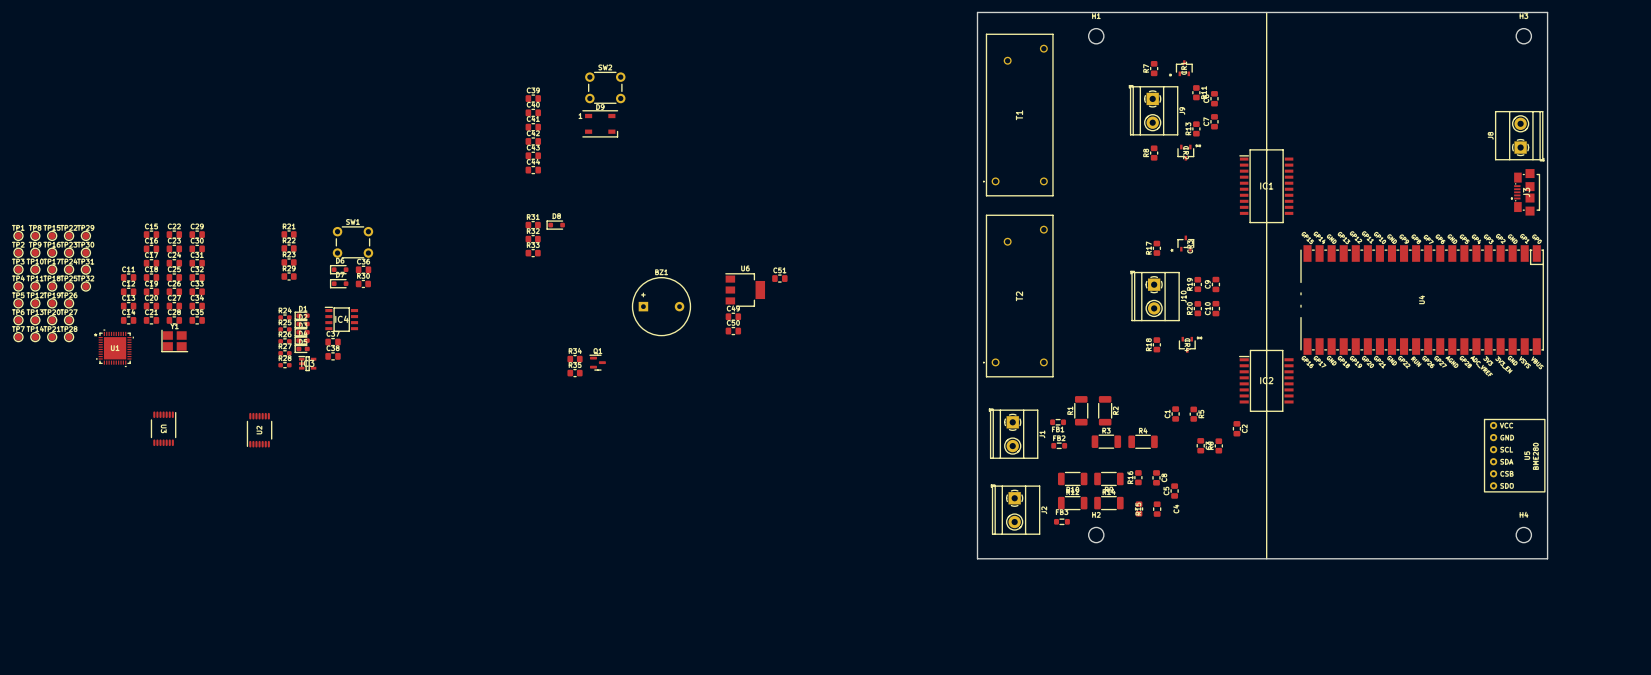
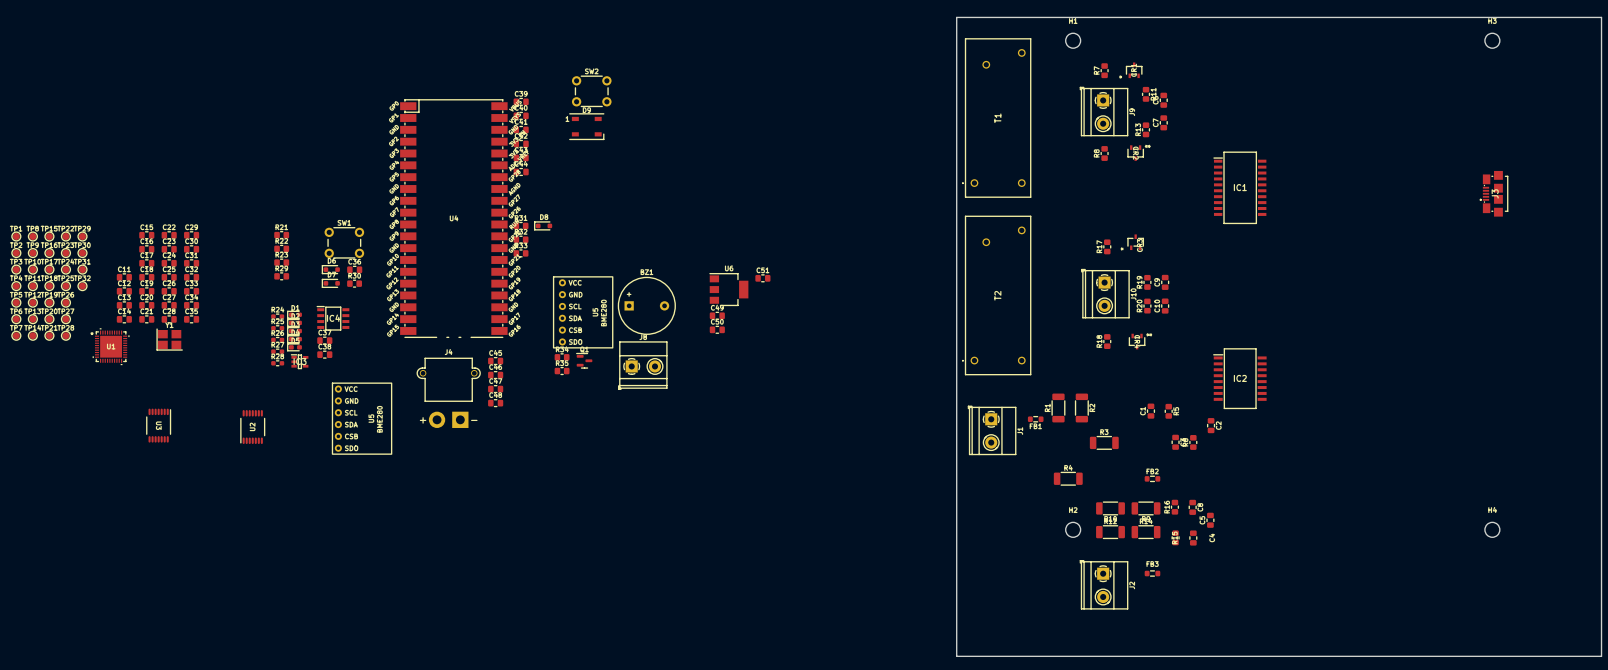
line: (1266, 12) (1266, 558) -> none
board edge: (1547, 12) (1547, 558) (977, 558) -> (1515, 17) (1601, 17) (1601, 656) (956, 656) (956, 553)
part position: (1154, 68) -> (1104, 70)
part position: (1184, 68) -> (1134, 70)
part position: (1196, 92) -> (1146, 94)
part position: (1214, 98) -> (1163, 100)
part position: (1153, 110) -> (1104, 111)
part position: (1214, 121) -> (1163, 122)
part position: (1196, 128) -> (1146, 129)
part rotation: 0° (1519, 136) -> 90° clockwise (642, 365)
part position: (1519, 136) -> (642, 365)
part position: (1185, 152) -> (1135, 153)
part position: (1154, 153) -> (1104, 153)
part position: (1185, 243) -> (1135, 242)
part position: (1156, 248) -> (1107, 246)
part position: (1197, 284) -> (1147, 282)
part position: (1215, 284) -> (1165, 282)
part position: (1155, 295) -> (1105, 293)
part rotation: 0° (1422, 300) -> 90° counterclockwise (453, 218)
part position: (1422, 300) -> (453, 218)
part position: (1197, 308) -> (1147, 306)
part position: (1215, 308) -> (1165, 306)
part: none -> (583, 312)
part position: (1156, 344) -> (1107, 341)
part position: (1187, 344) -> (1137, 341)
part: none -> (495, 361)
part: none -> (495, 375)
part: none -> (495, 389)
part: none -> (448, 393)
part: none -> (495, 403)
part: none -> (362, 418)
part position: (1106, 441) -> (1104, 442)
part position: (1143, 441) -> (1068, 478)
part position: (1059, 445) -> (1152, 478)
part: (1514, 455) -> none
part position: (1138, 477) -> (1174, 507)
part position: (1156, 477) -> (1192, 507)
part position: (1072, 478) -> (1110, 508)
part position: (1108, 478) -> (1146, 508)
part position: (1174, 491) -> (1210, 520)
part position: (1072, 503) -> (1110, 532)
part position: (1108, 503) -> (1146, 532)
part position: (1139, 508) -> (1175, 537)
part position: (1015, 509) -> (1104, 584)
part position: (1157, 509) -> (1193, 538)
part position: (1061, 521) -> (1152, 573)

